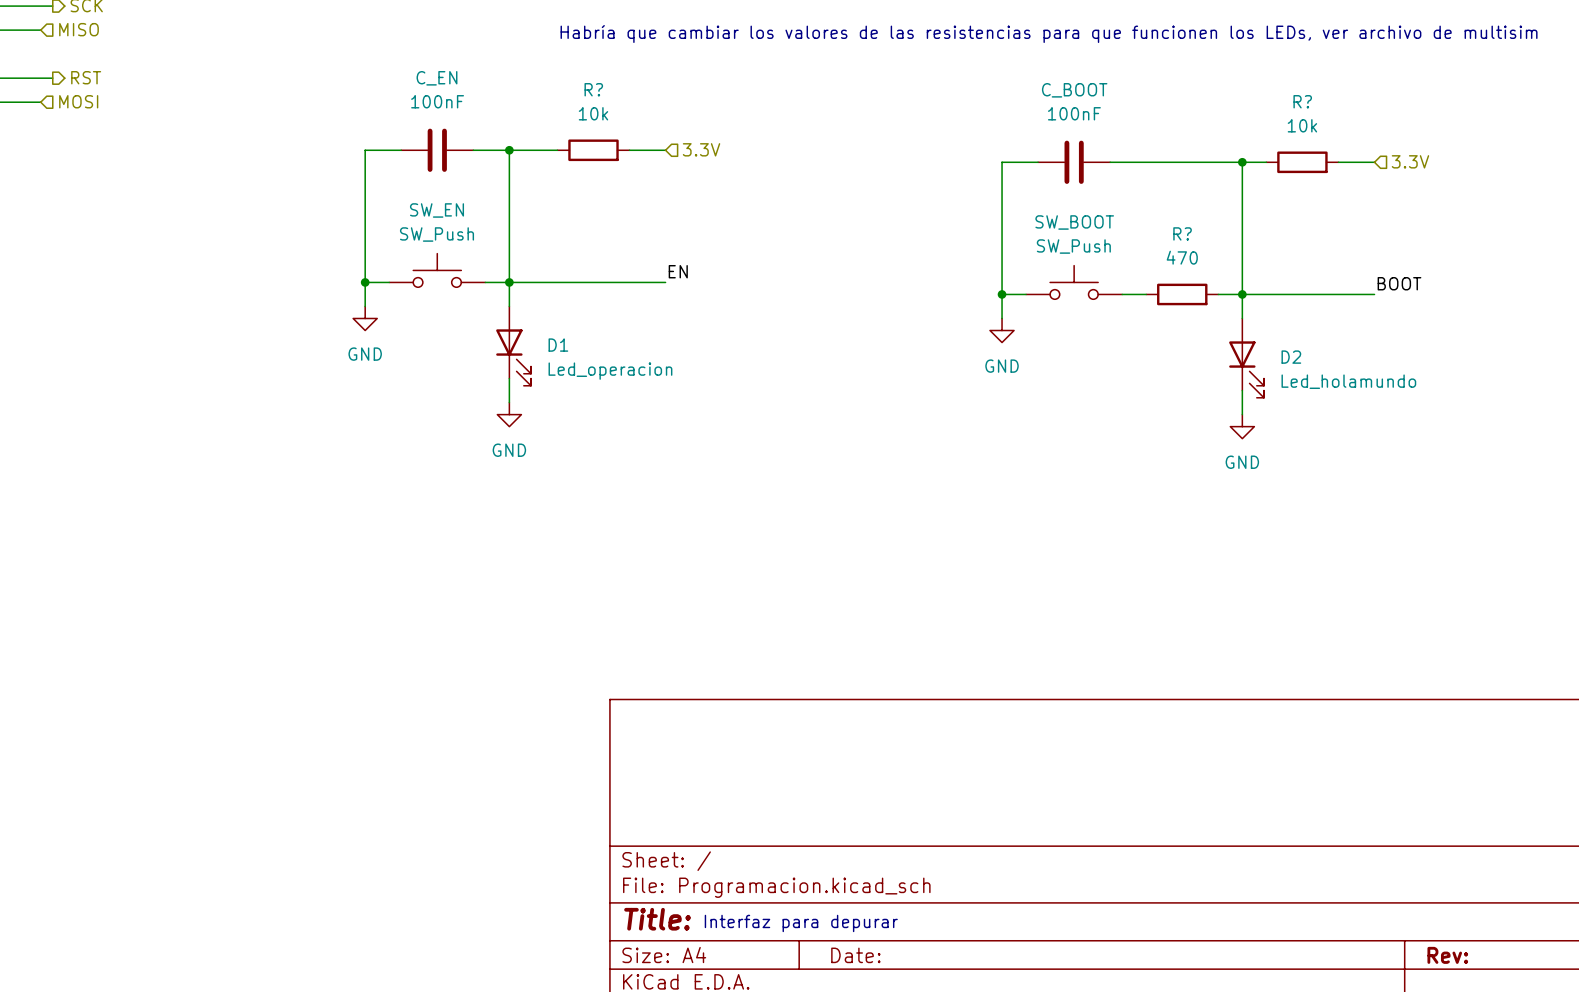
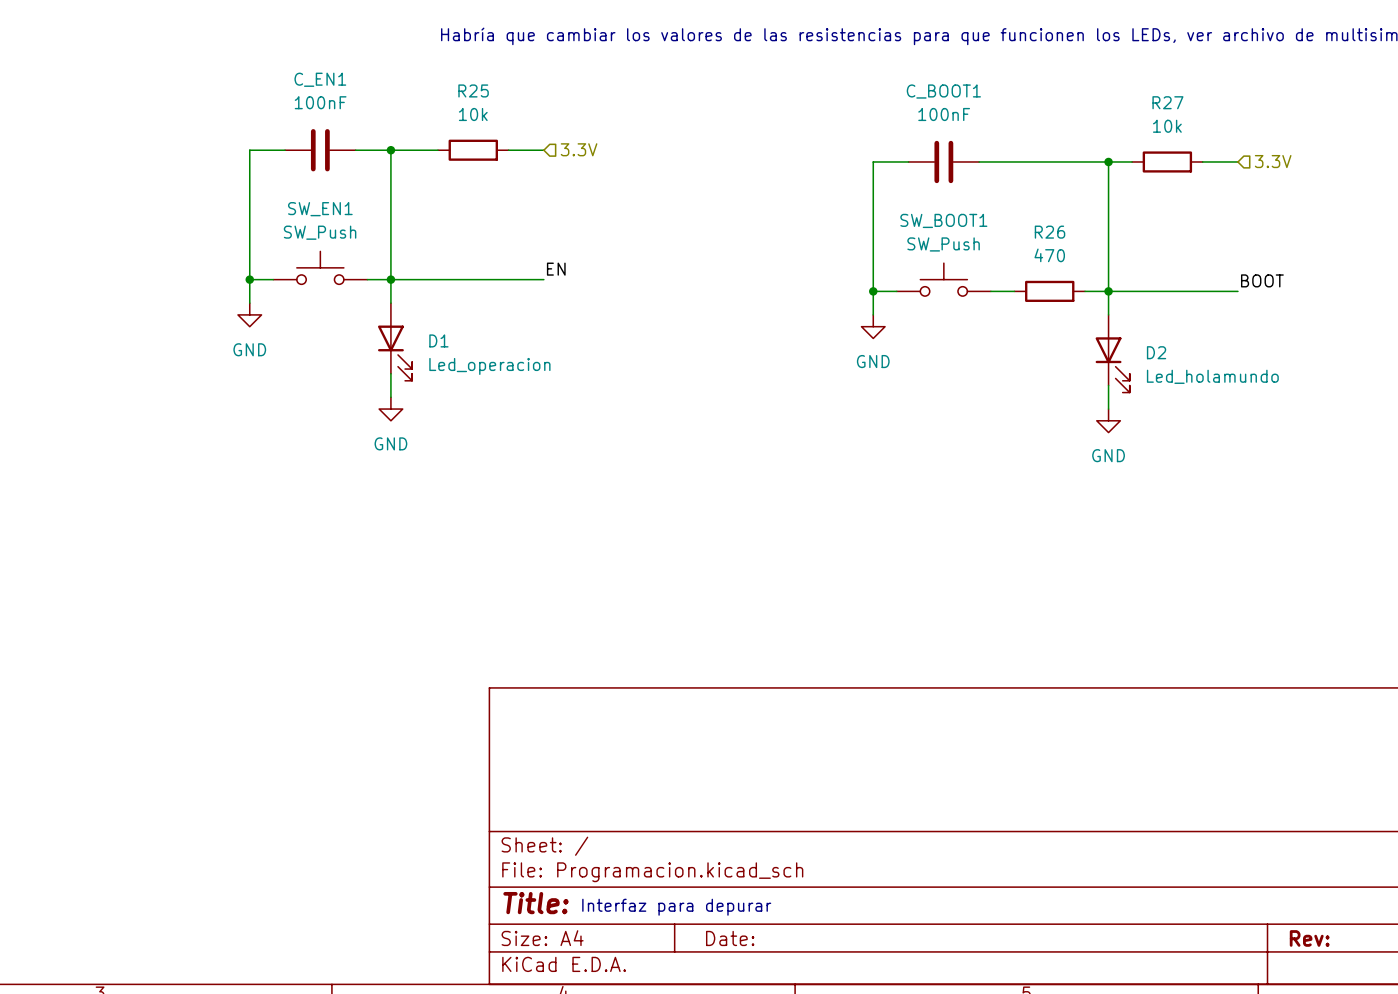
C_EN name: C_EN (436, 78) -> C_EN1 (320, 79)
R? name: R? (593, 89) -> R25 (473, 90)
C_BOOT name: C_BOOT (1074, 90) -> C_BOOT1 (943, 91)
R? name: R? (1302, 101) -> R27 (1167, 102)
SW_EN name: SW_EN (436, 210) -> SW_EN1 (320, 209)
SW_BOOT name: SW_BOOT (1074, 222) -> SW_BOOT1 (943, 220)
R? name: R? (1182, 233) -> R26 (1050, 232)

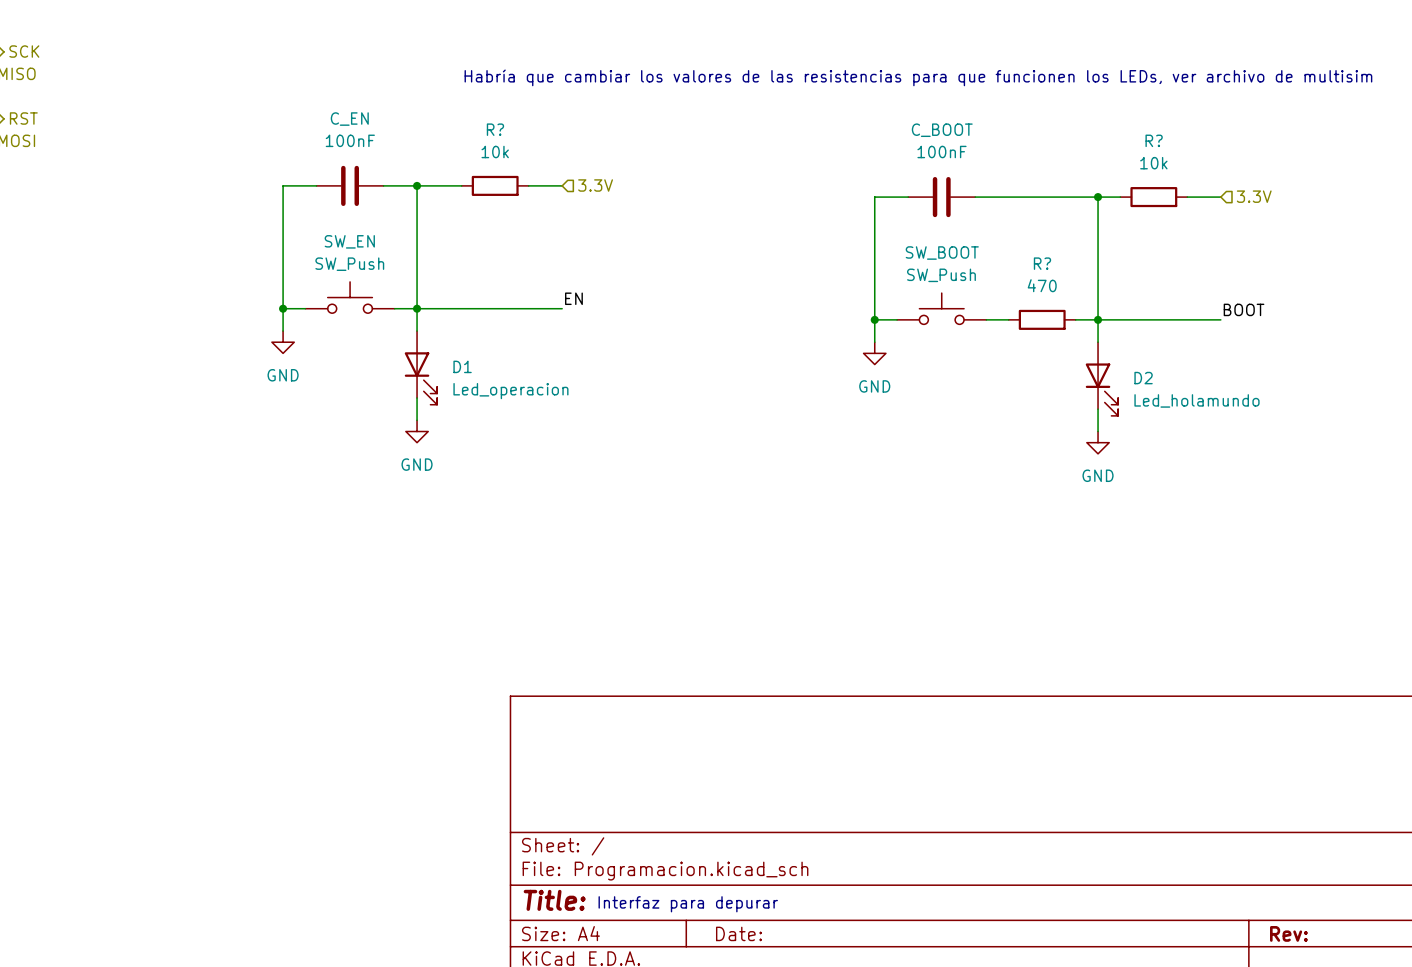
C_EN1 name: C_EN1 (320, 79) -> C_EN (349, 119)
R25 name: R25 (473, 90) -> R? (495, 129)
C_BOOT1 name: C_BOOT1 (943, 91) -> C_BOOT (942, 130)
R27 name: R27 (1167, 102) -> R? (1154, 140)
SW_EN1 name: SW_EN1 (320, 209) -> SW_EN (349, 241)
SW_BOOT1 name: SW_BOOT1 (943, 220) -> SW_BOOT (942, 253)
R26 name: R26 (1050, 232) -> R? (1042, 263)

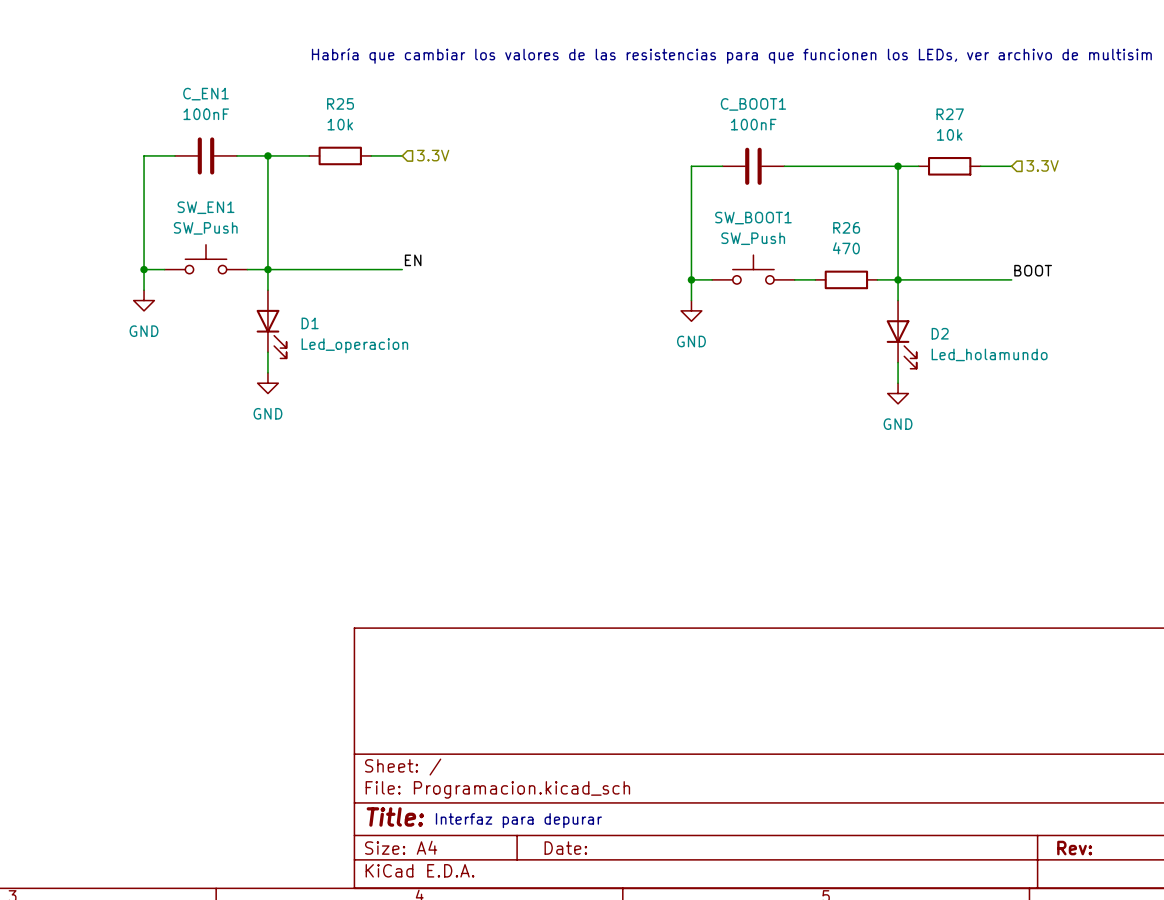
C_EN name: C_EN (349, 119) -> C_EN1 (205, 94)
R? name: R? (495, 129) -> R25 (340, 103)
C_BOOT name: C_BOOT (942, 130) -> C_BOOT1 (753, 104)
R? name: R? (1154, 140) -> R27 (950, 114)
SW_EN name: SW_EN (349, 241) -> SW_EN1 (205, 207)
SW_BOOT name: SW_BOOT (942, 253) -> SW_BOOT1 (753, 218)
R? name: R? (1042, 263) -> R26 (846, 227)

